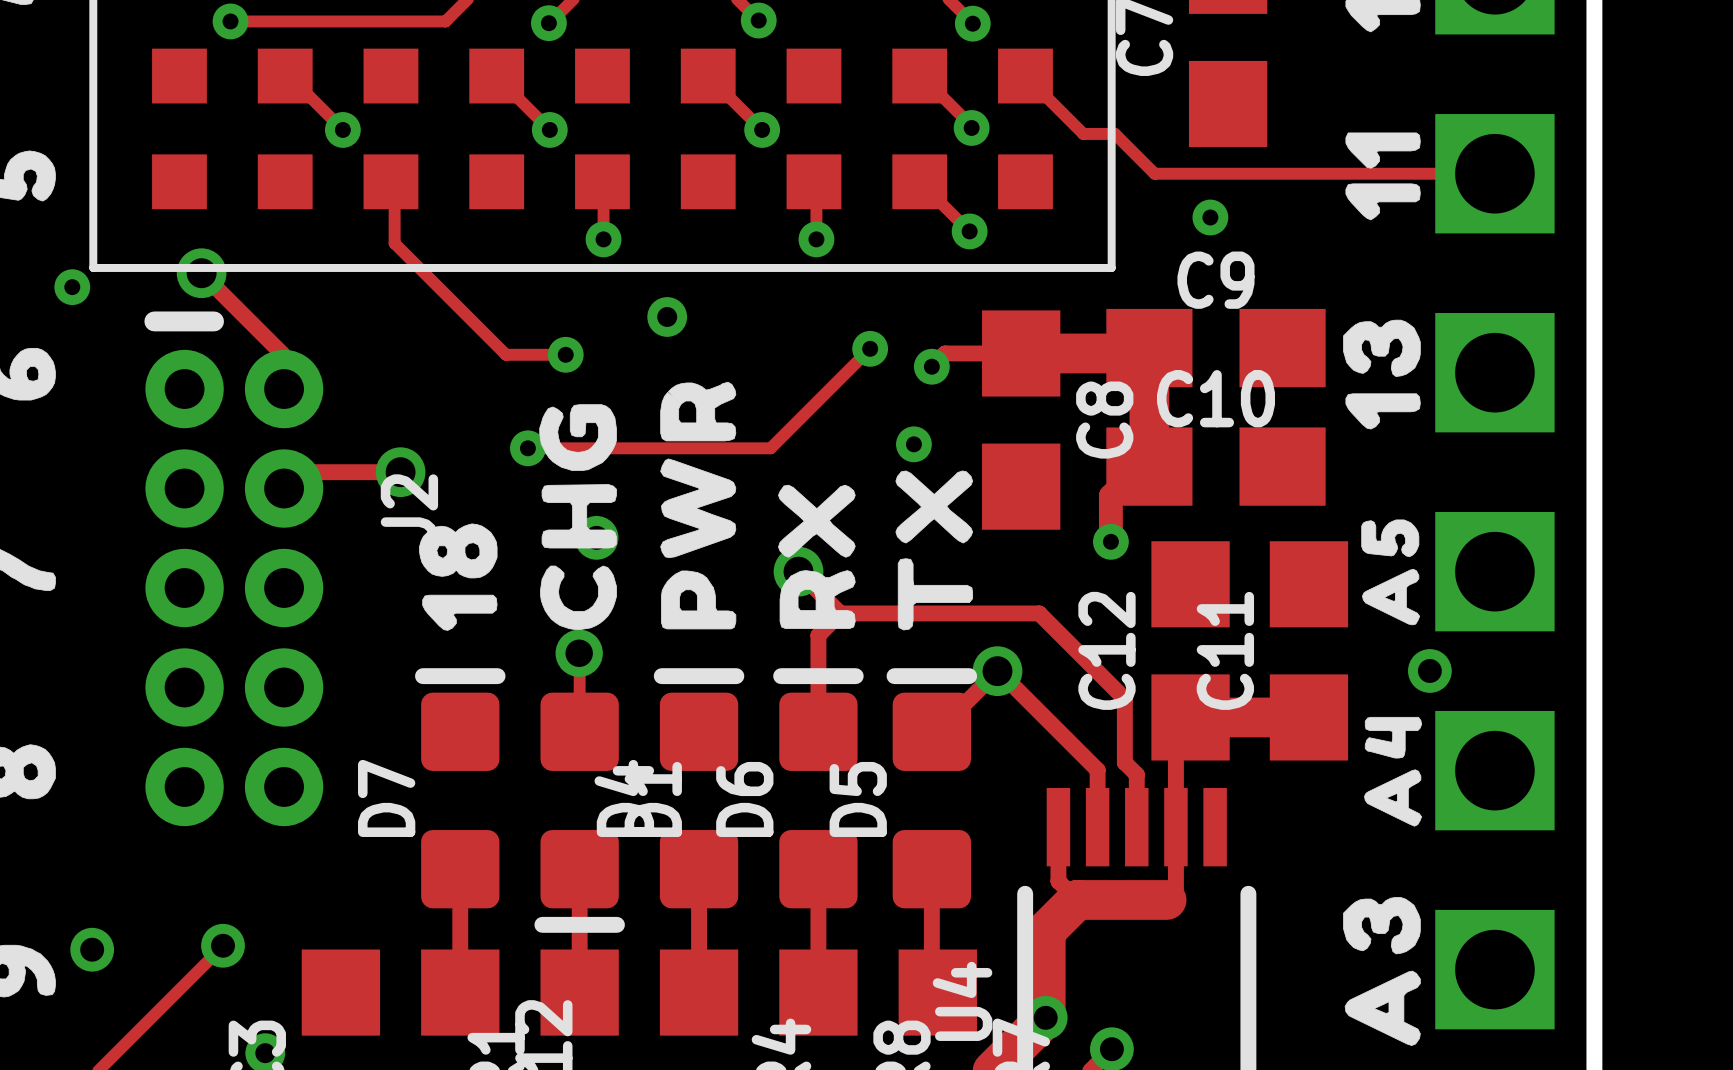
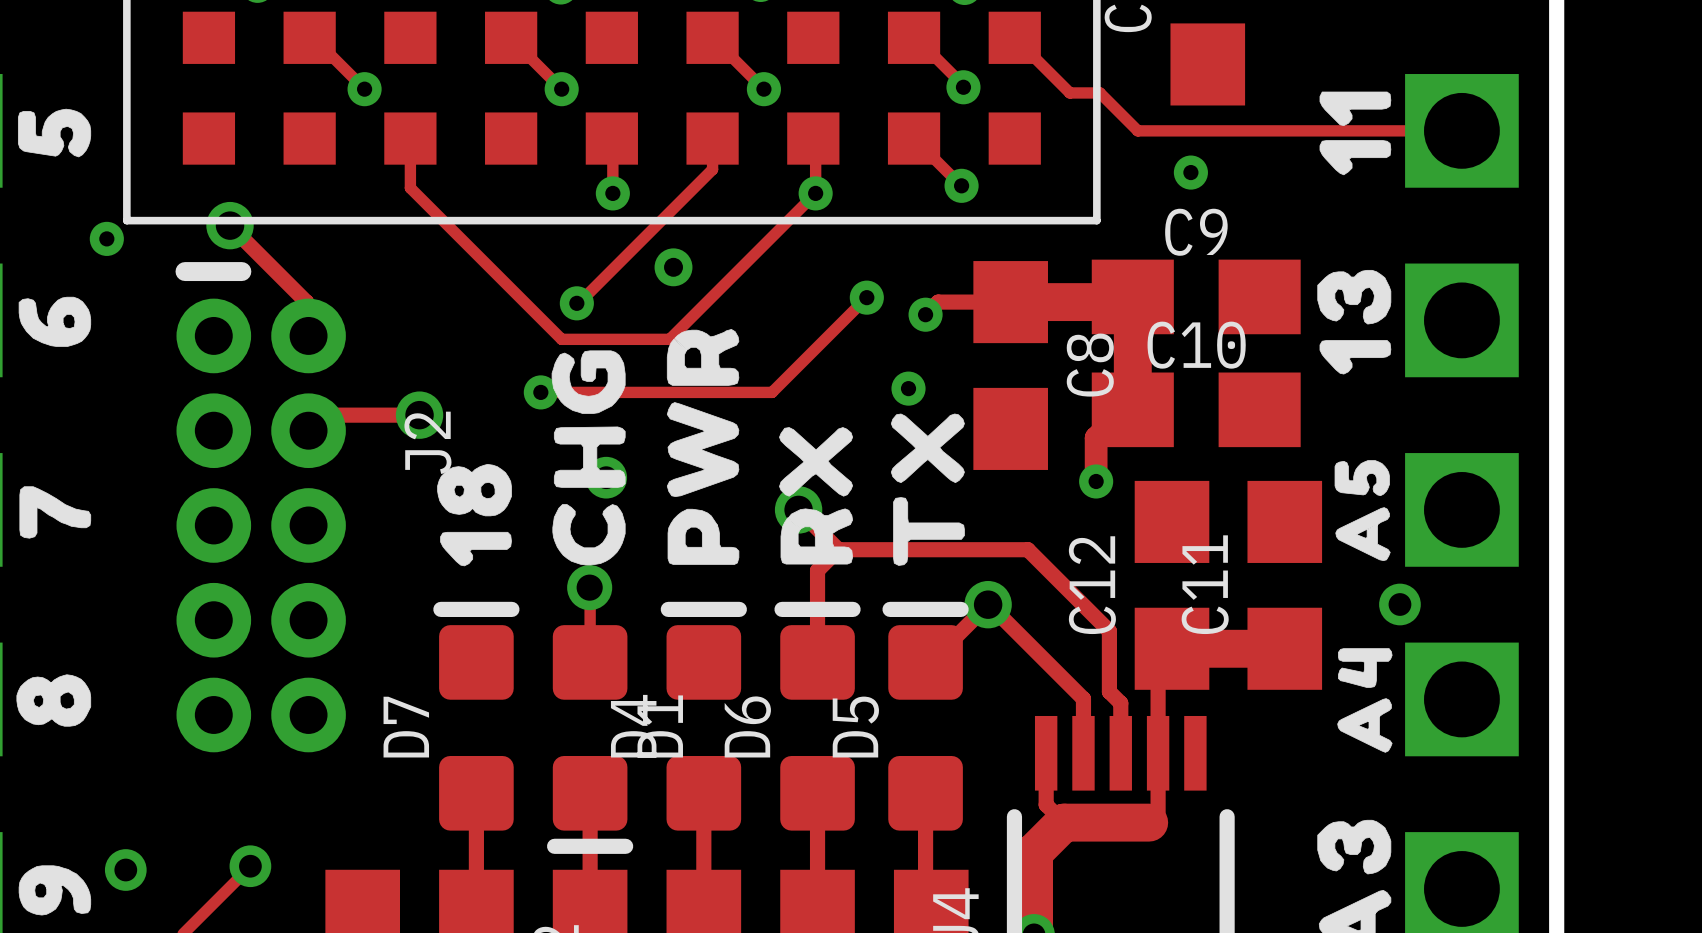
track: (390, 181) (394, 185) (394, 243) (506, 354) (565, 354) -> (410, 138) (410, 188) (561, 339) (669, 339) (815, 193)
track: none -> (712, 138) (712, 169) (576, 303)

